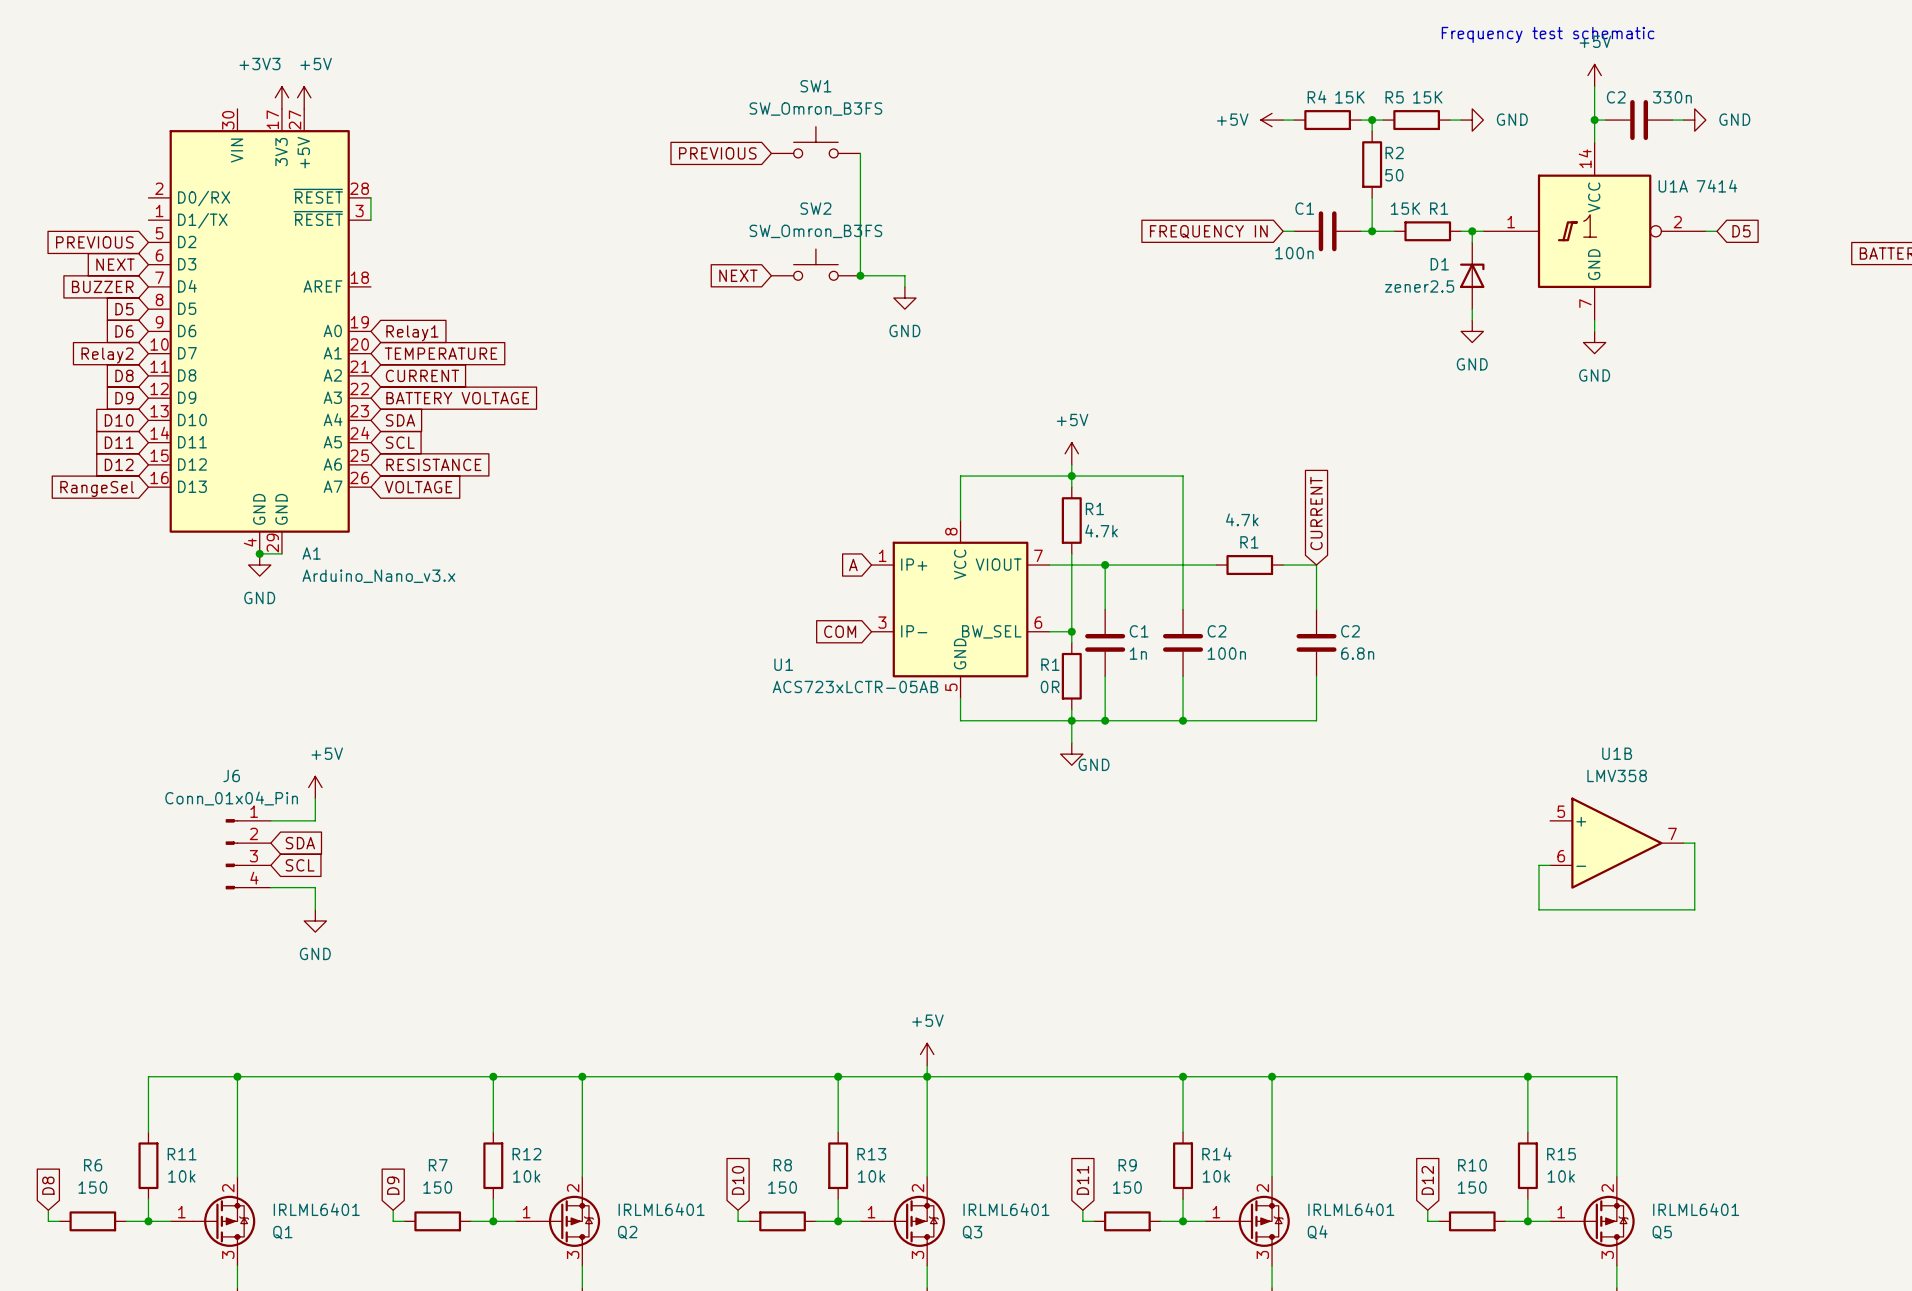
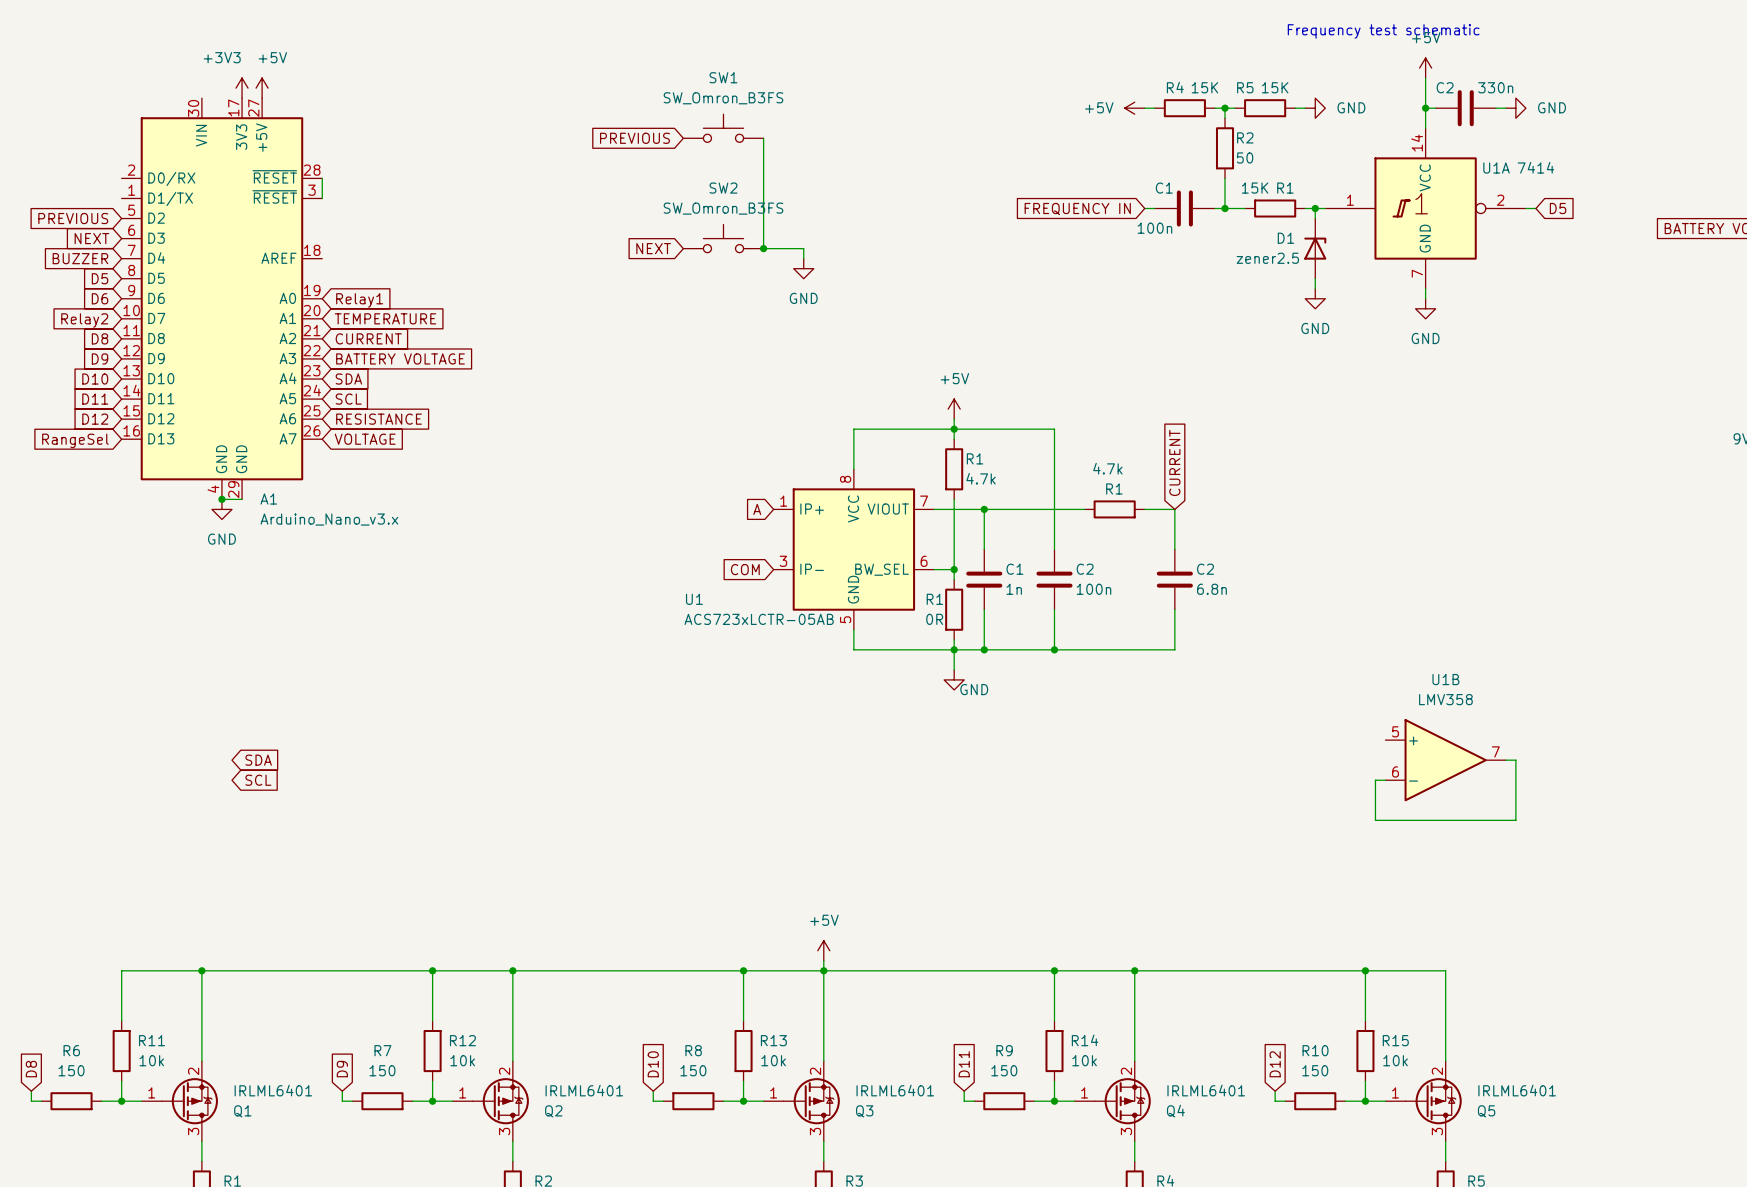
power symbol: +5V (315, 787) -> none
wire: (315, 798) (315, 820) (270, 820) -> none
J6: Conn_01x04_Pin (248, 854) -> none
wire: (270, 887) (315, 887) (315, 909) -> none
power symbol: GND (315, 920) -> none

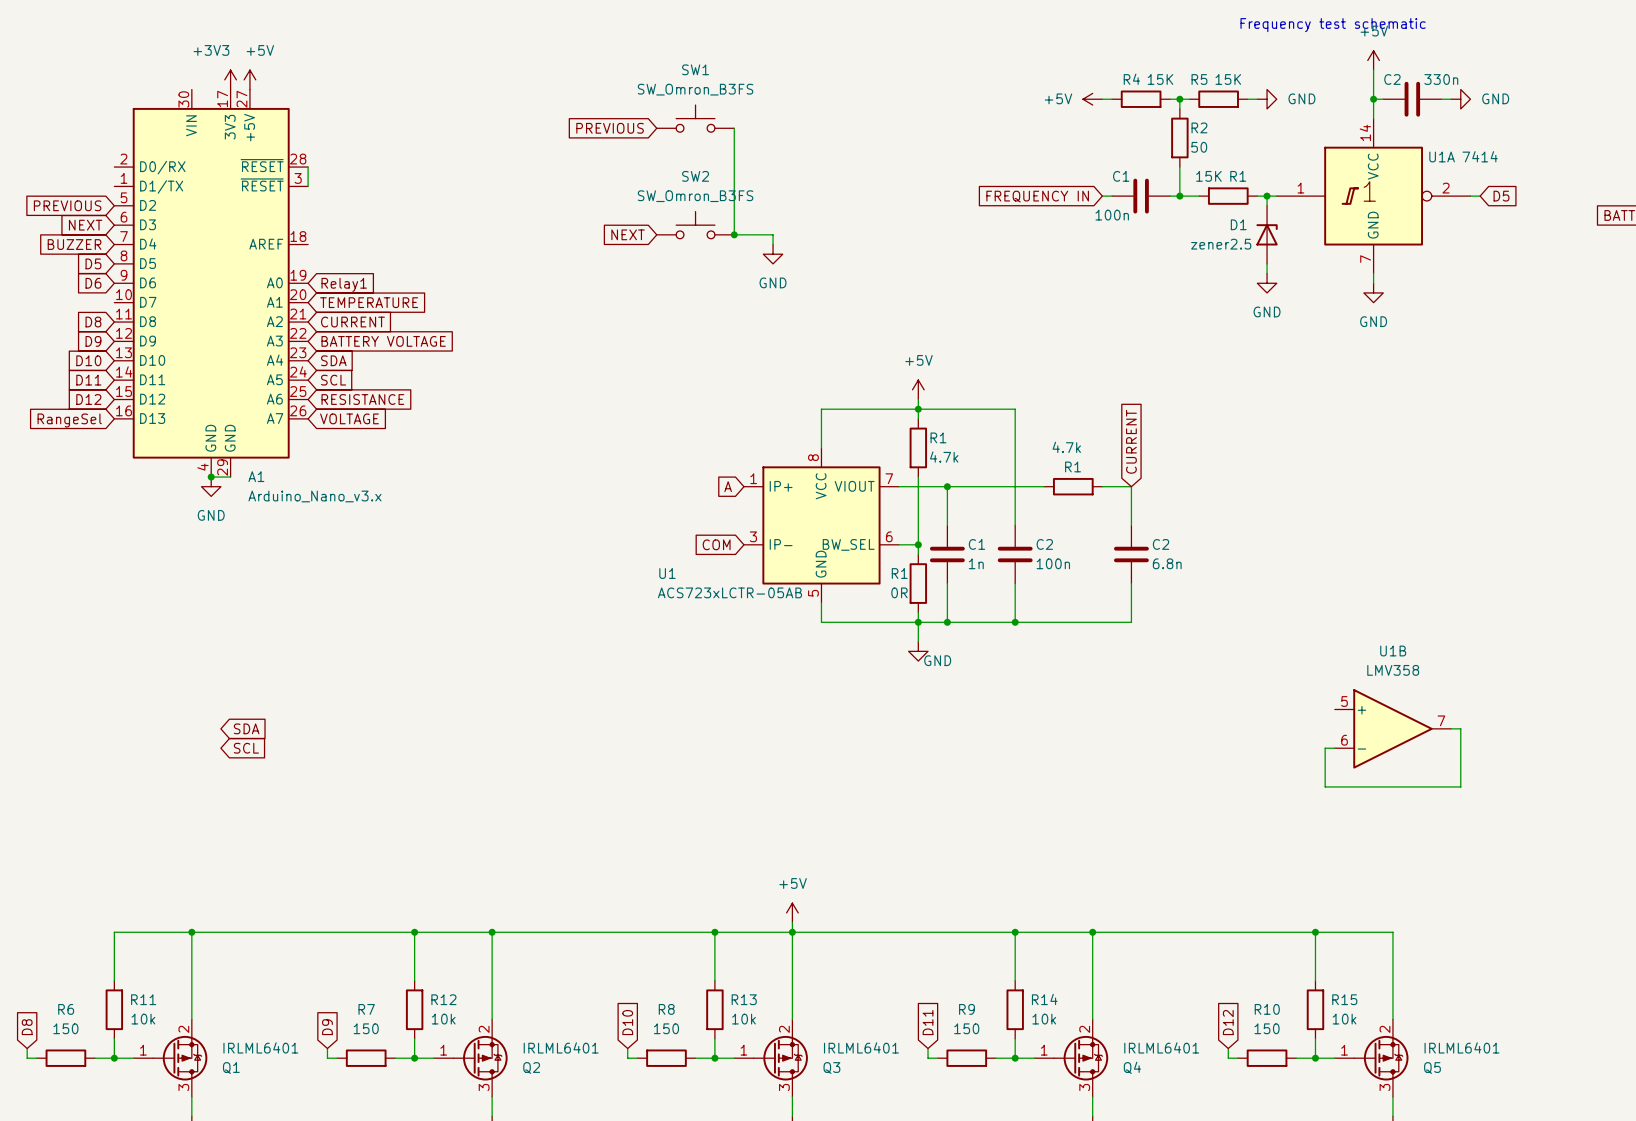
global label: Relay2 (84, 320) -> none

